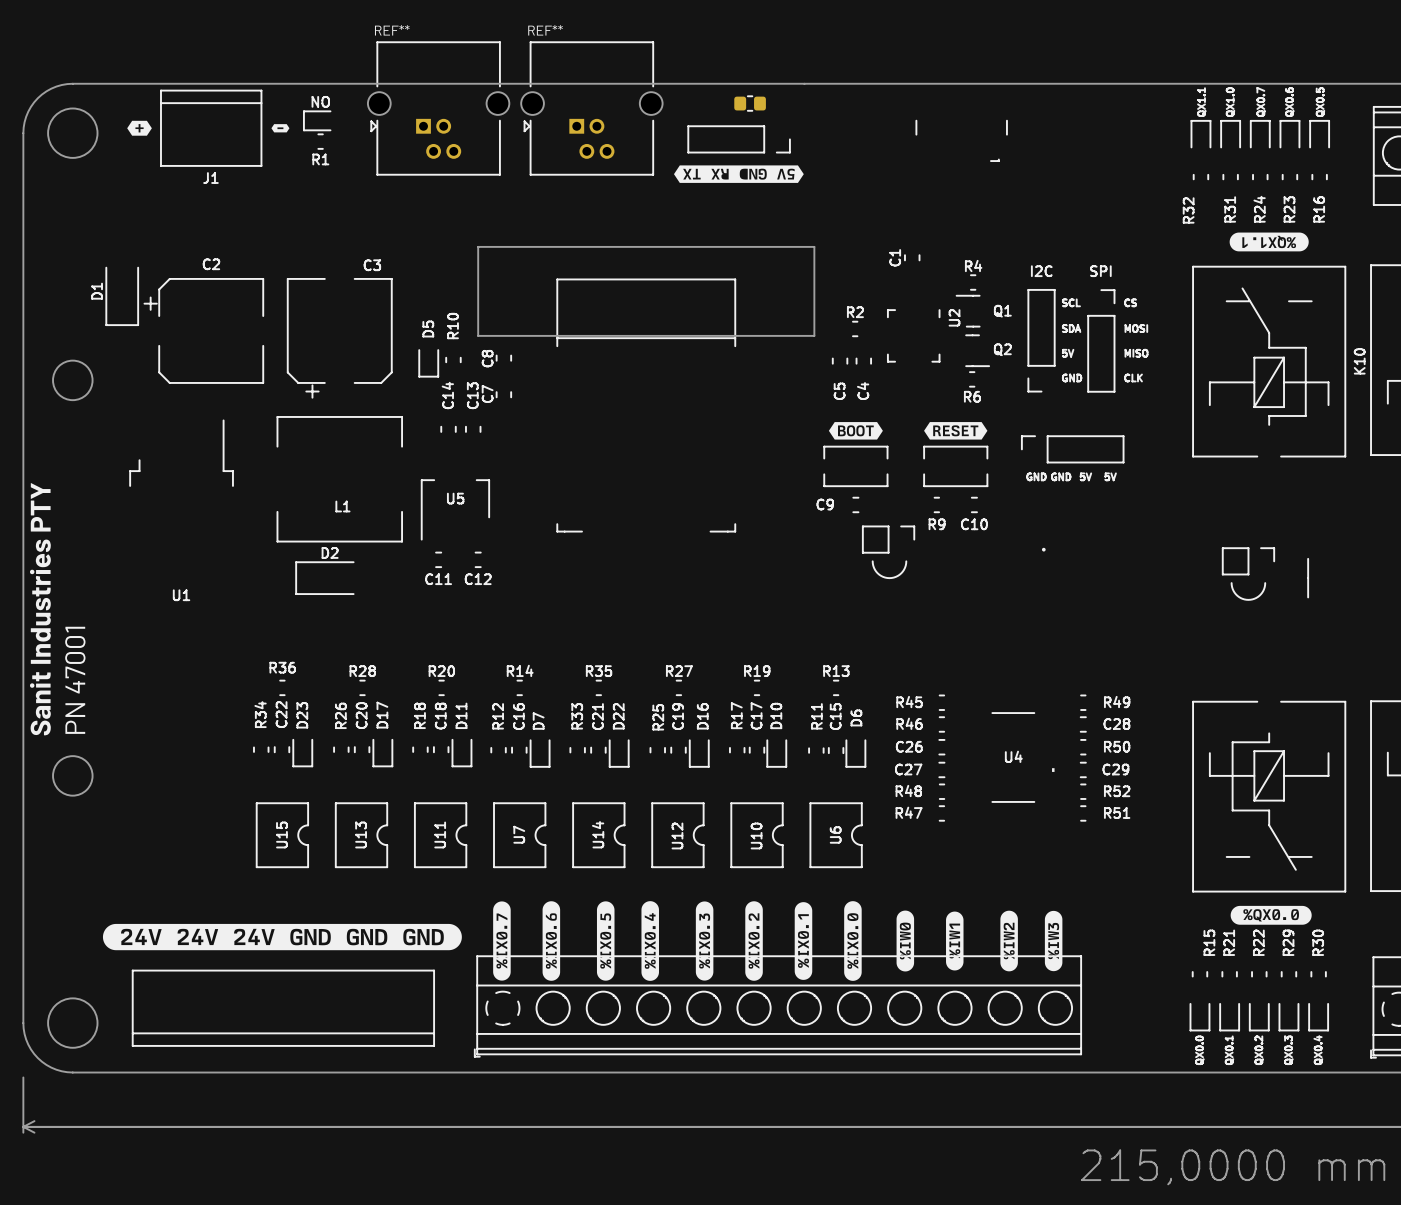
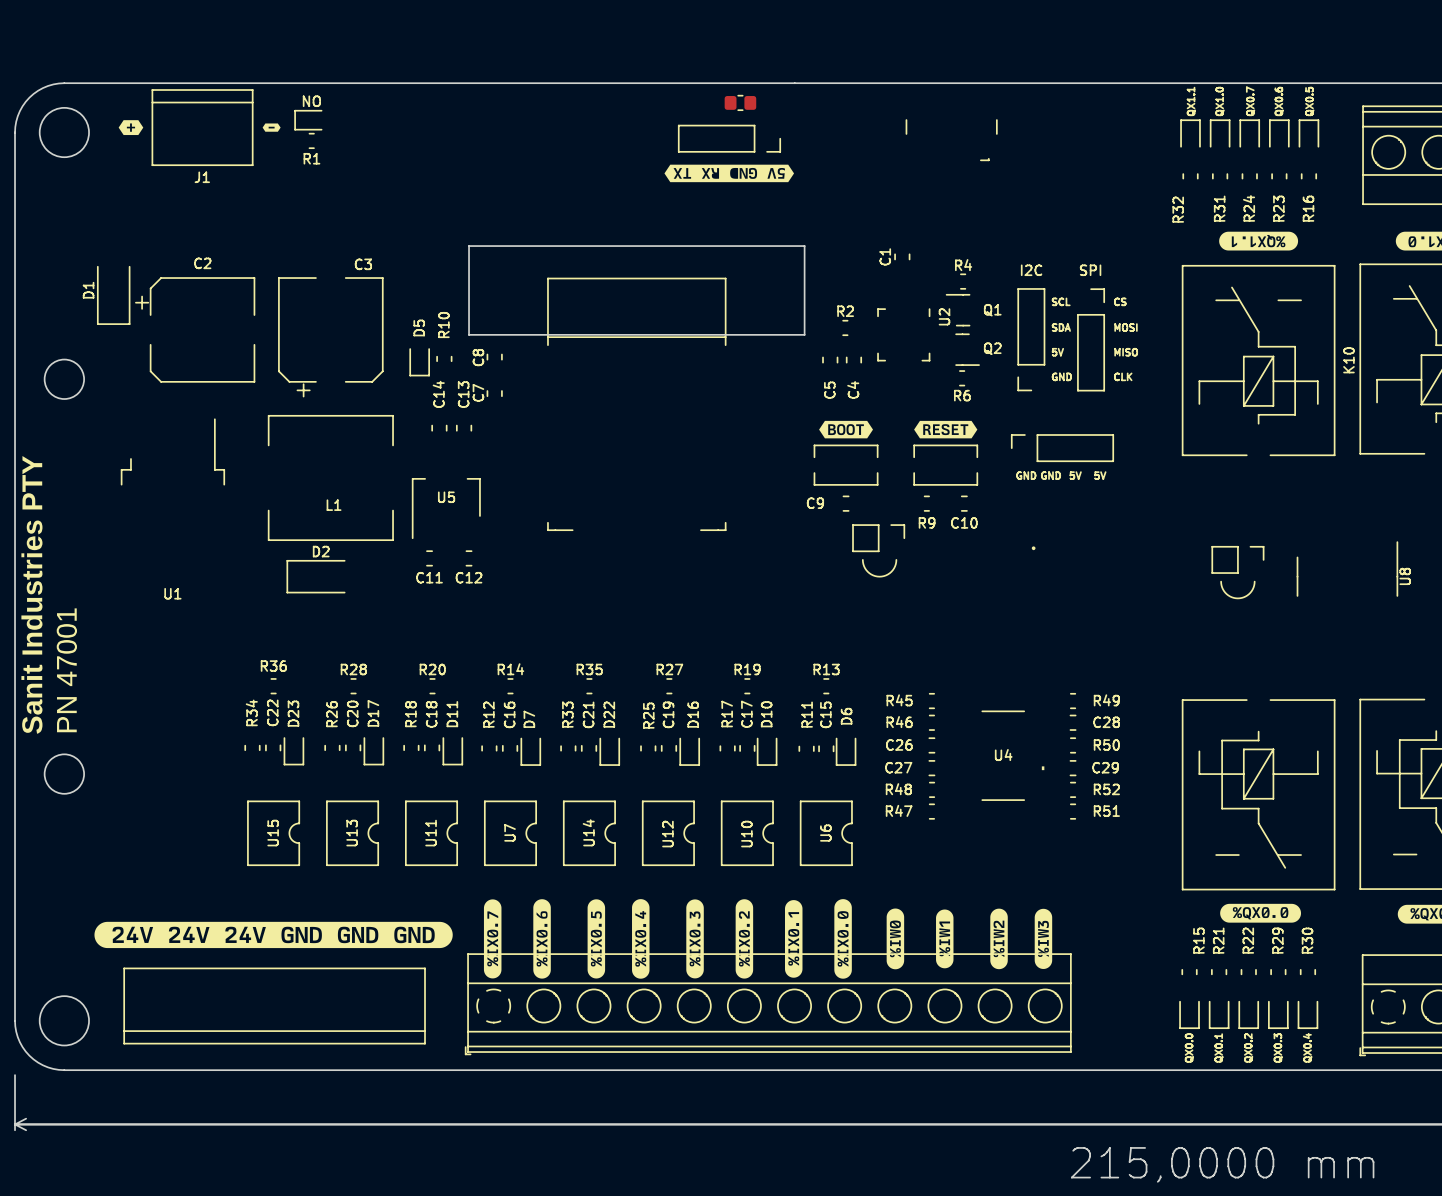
REF**: (438, 108) -> none
REF**: (591, 108) -> none

